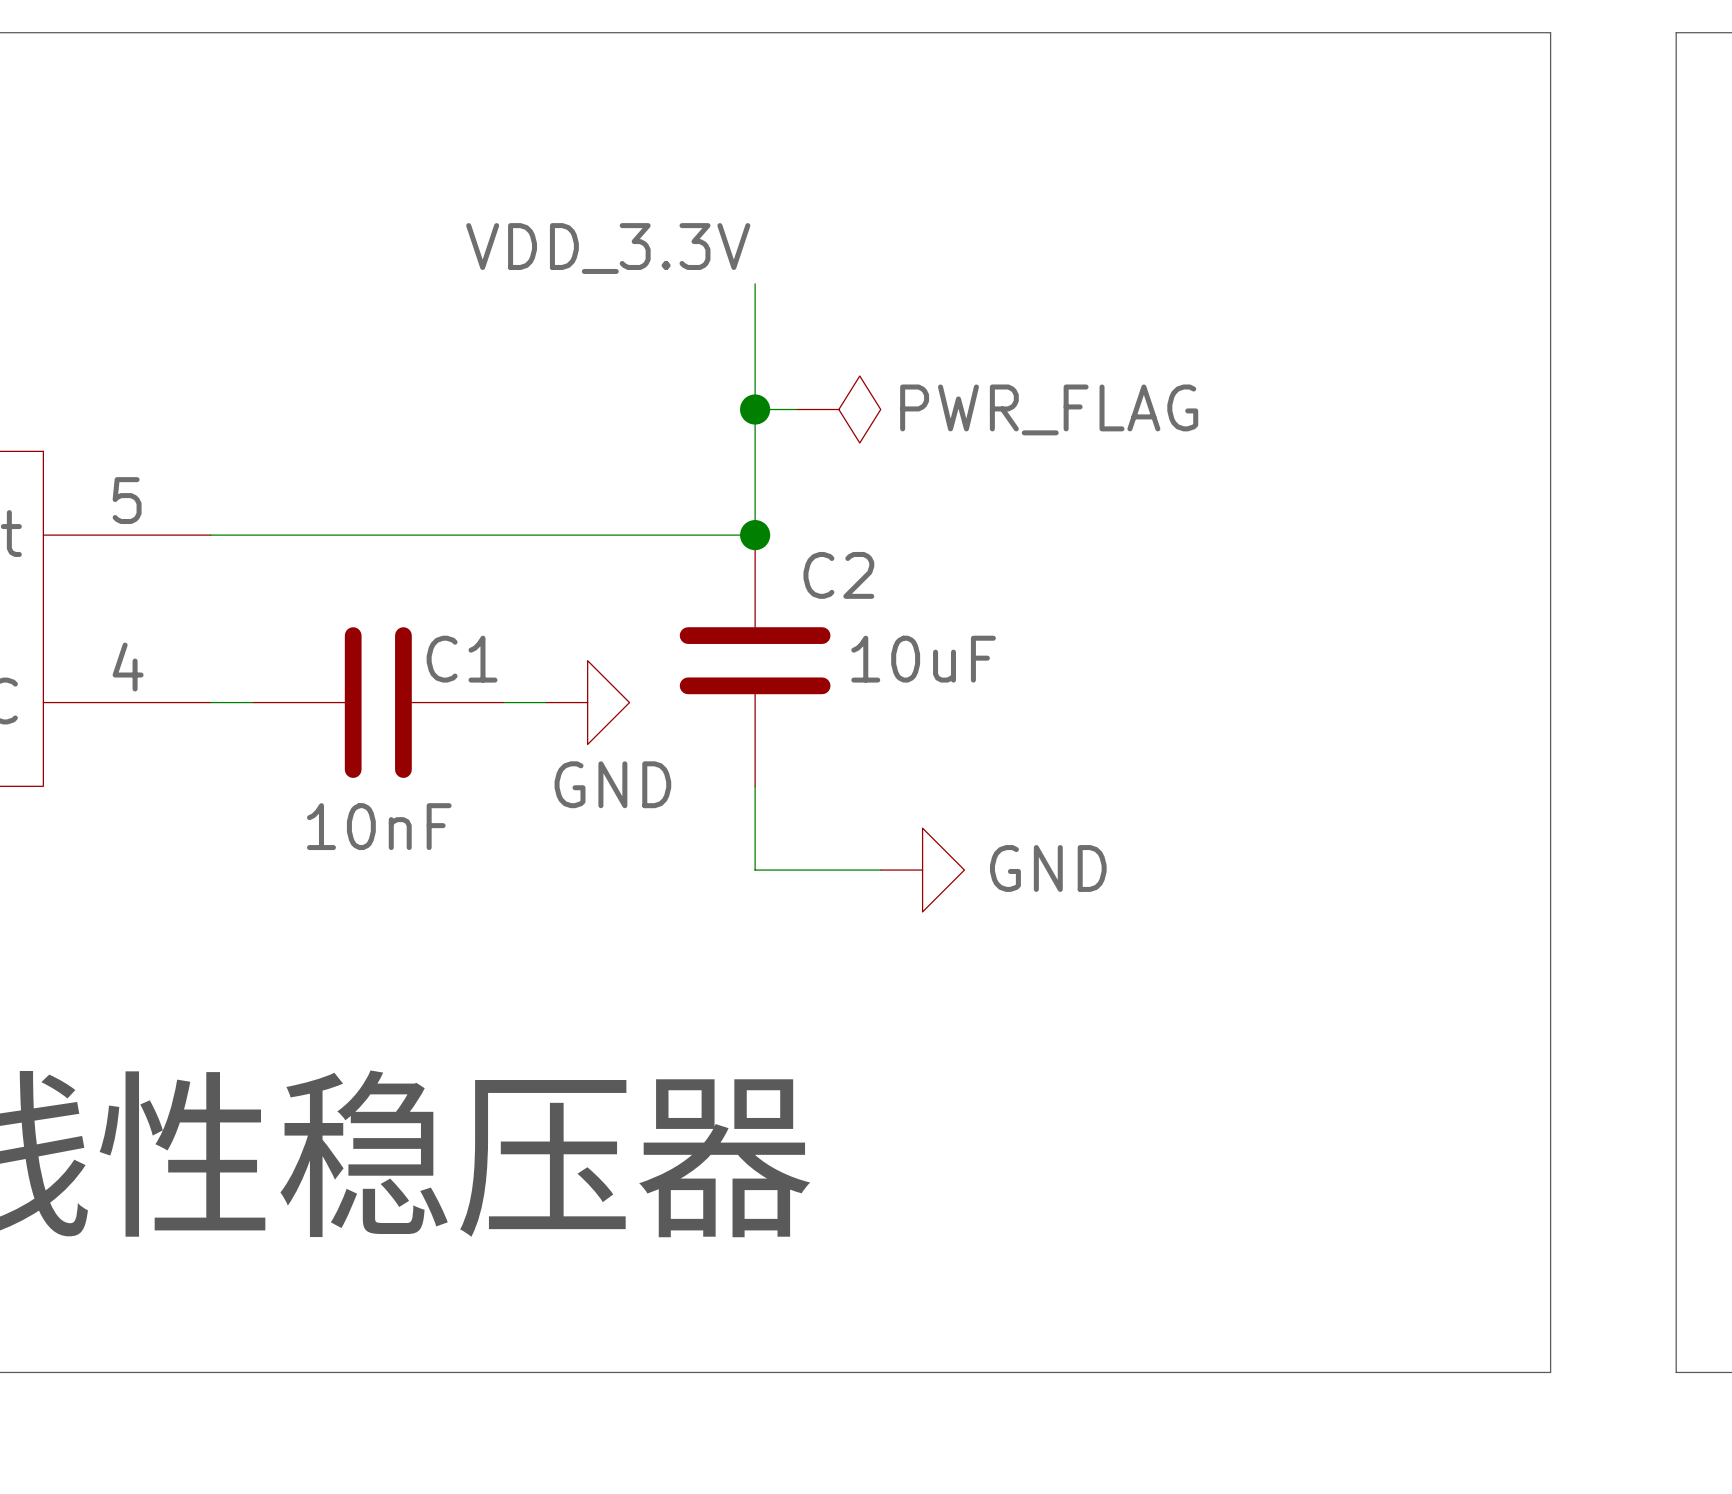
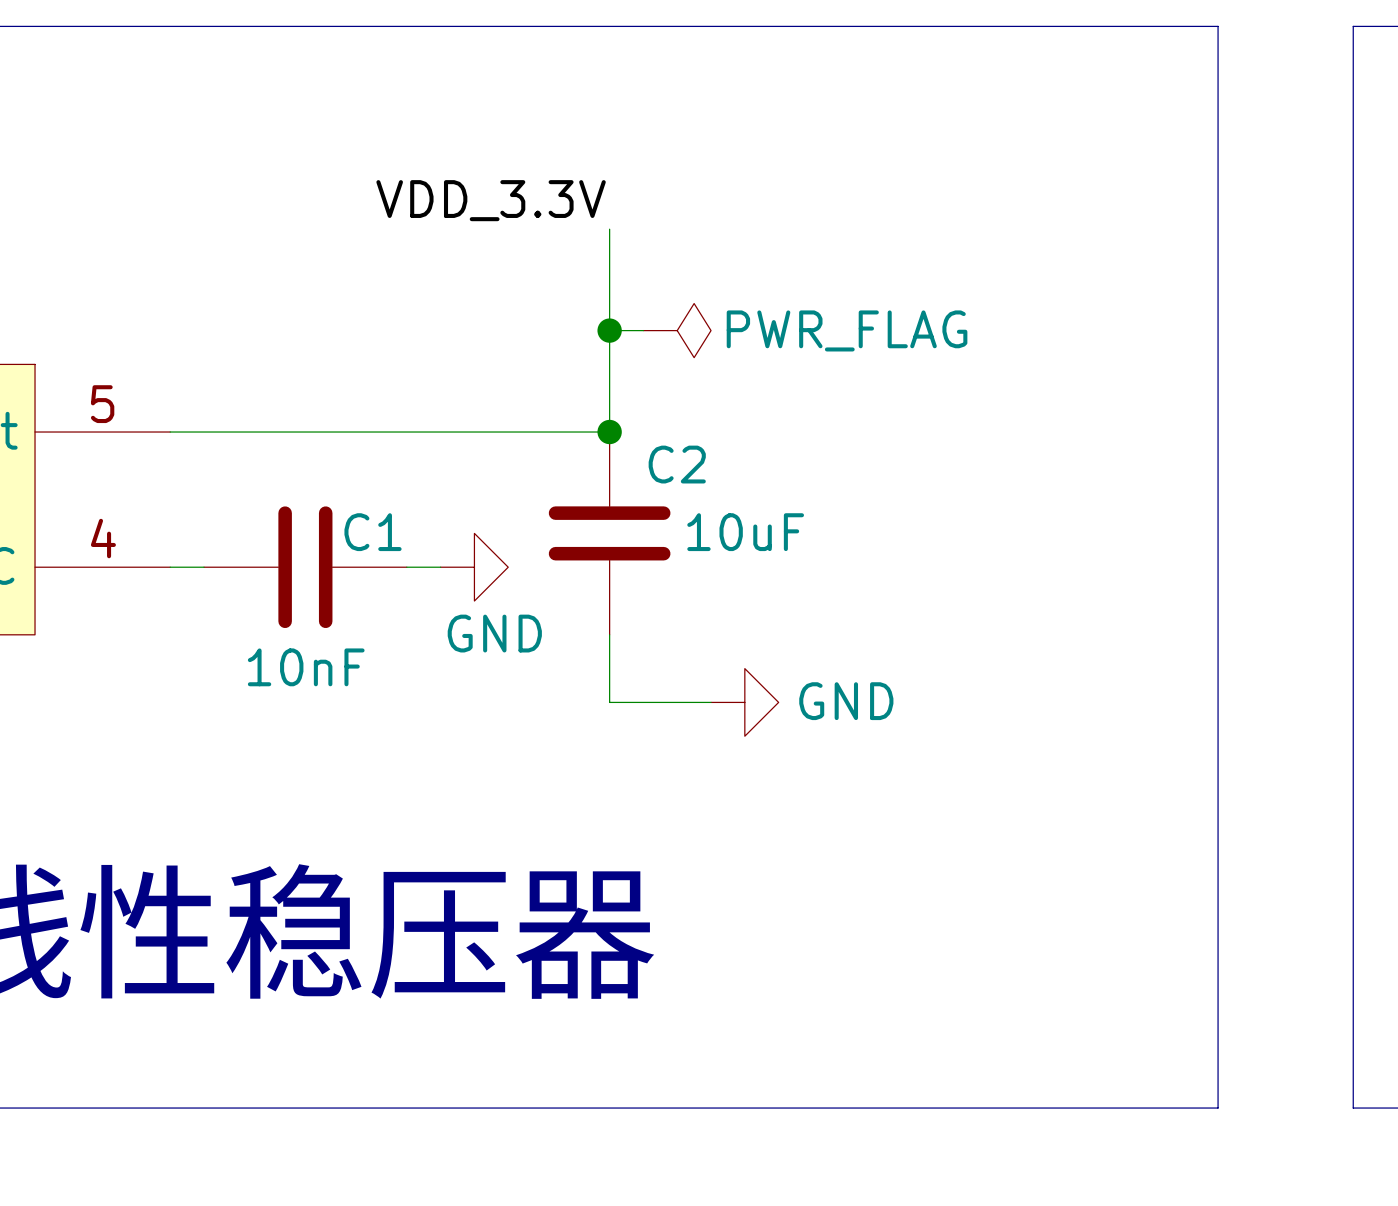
line: (1508, 32) (1550, 32) (1550, 1372) (1508, 1372) -> (1218, 26) (1218, 1108)

